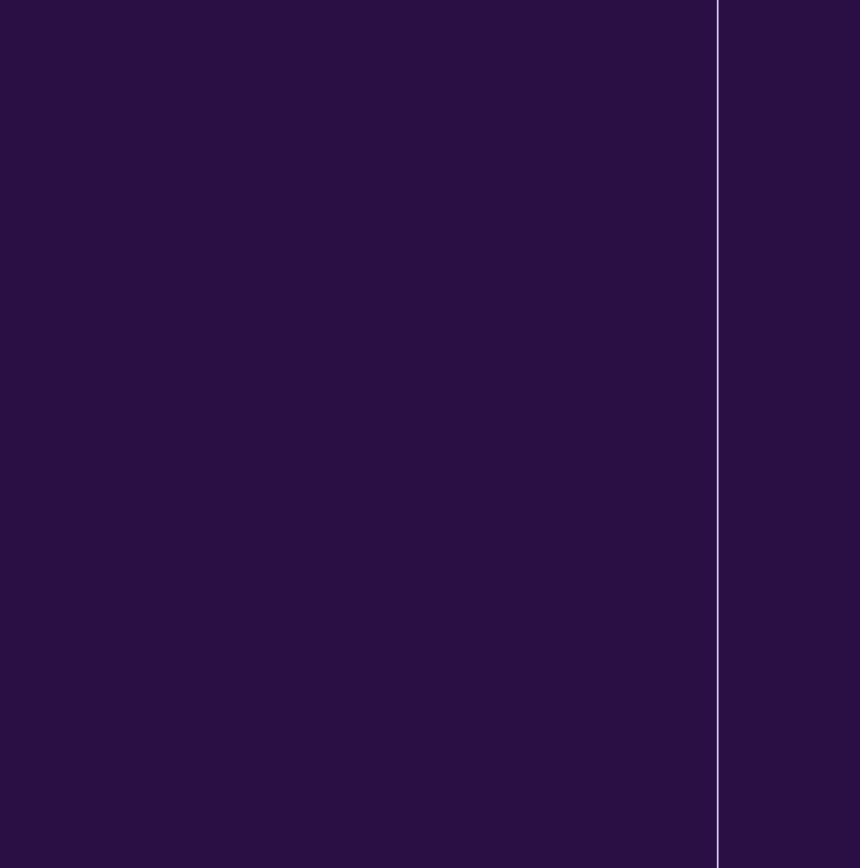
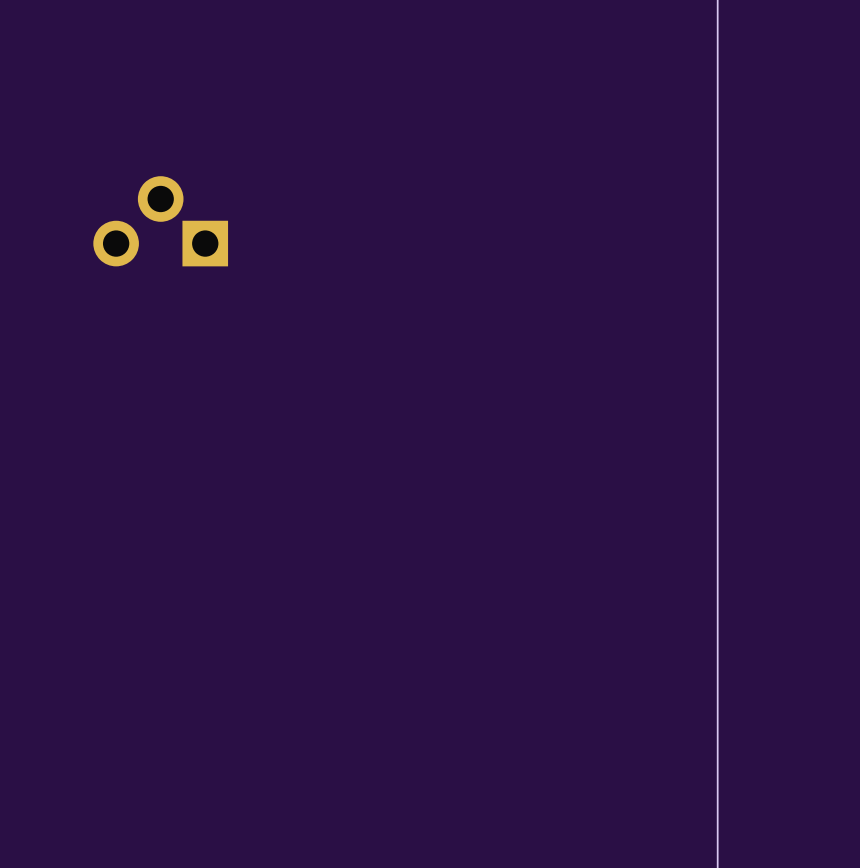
part: none -> (160, 221)

